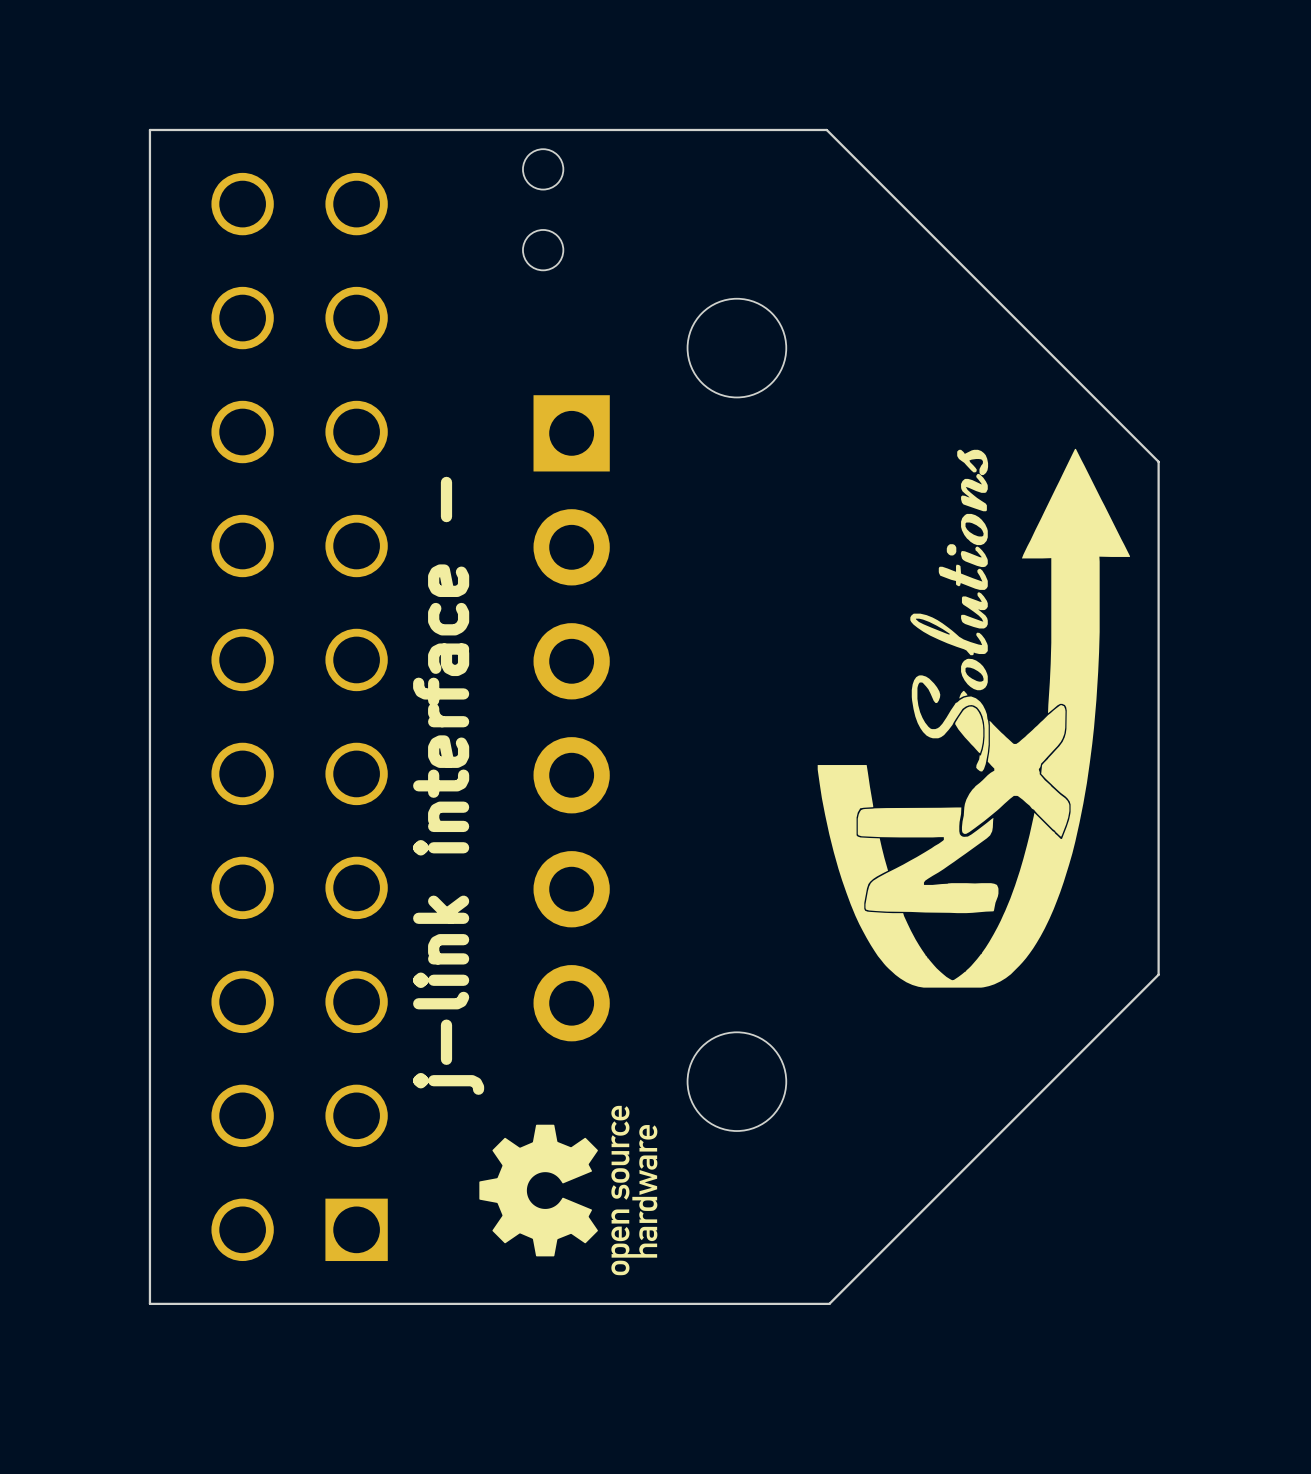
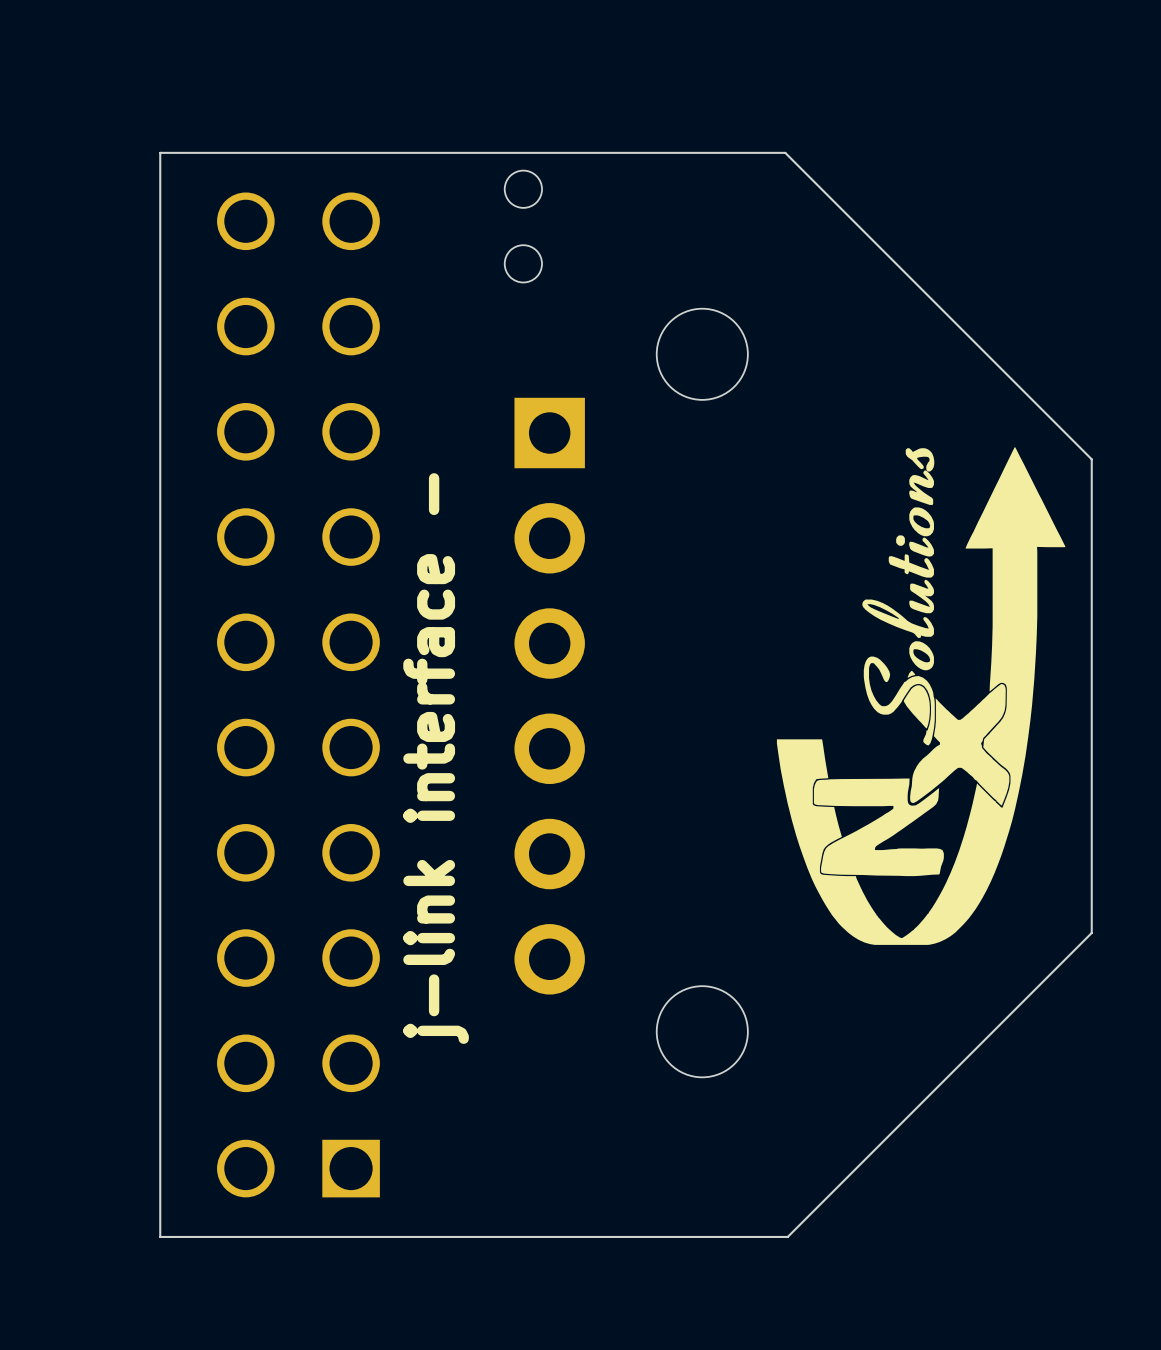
drawing: [479, 1105, 658, 1276] -> none

